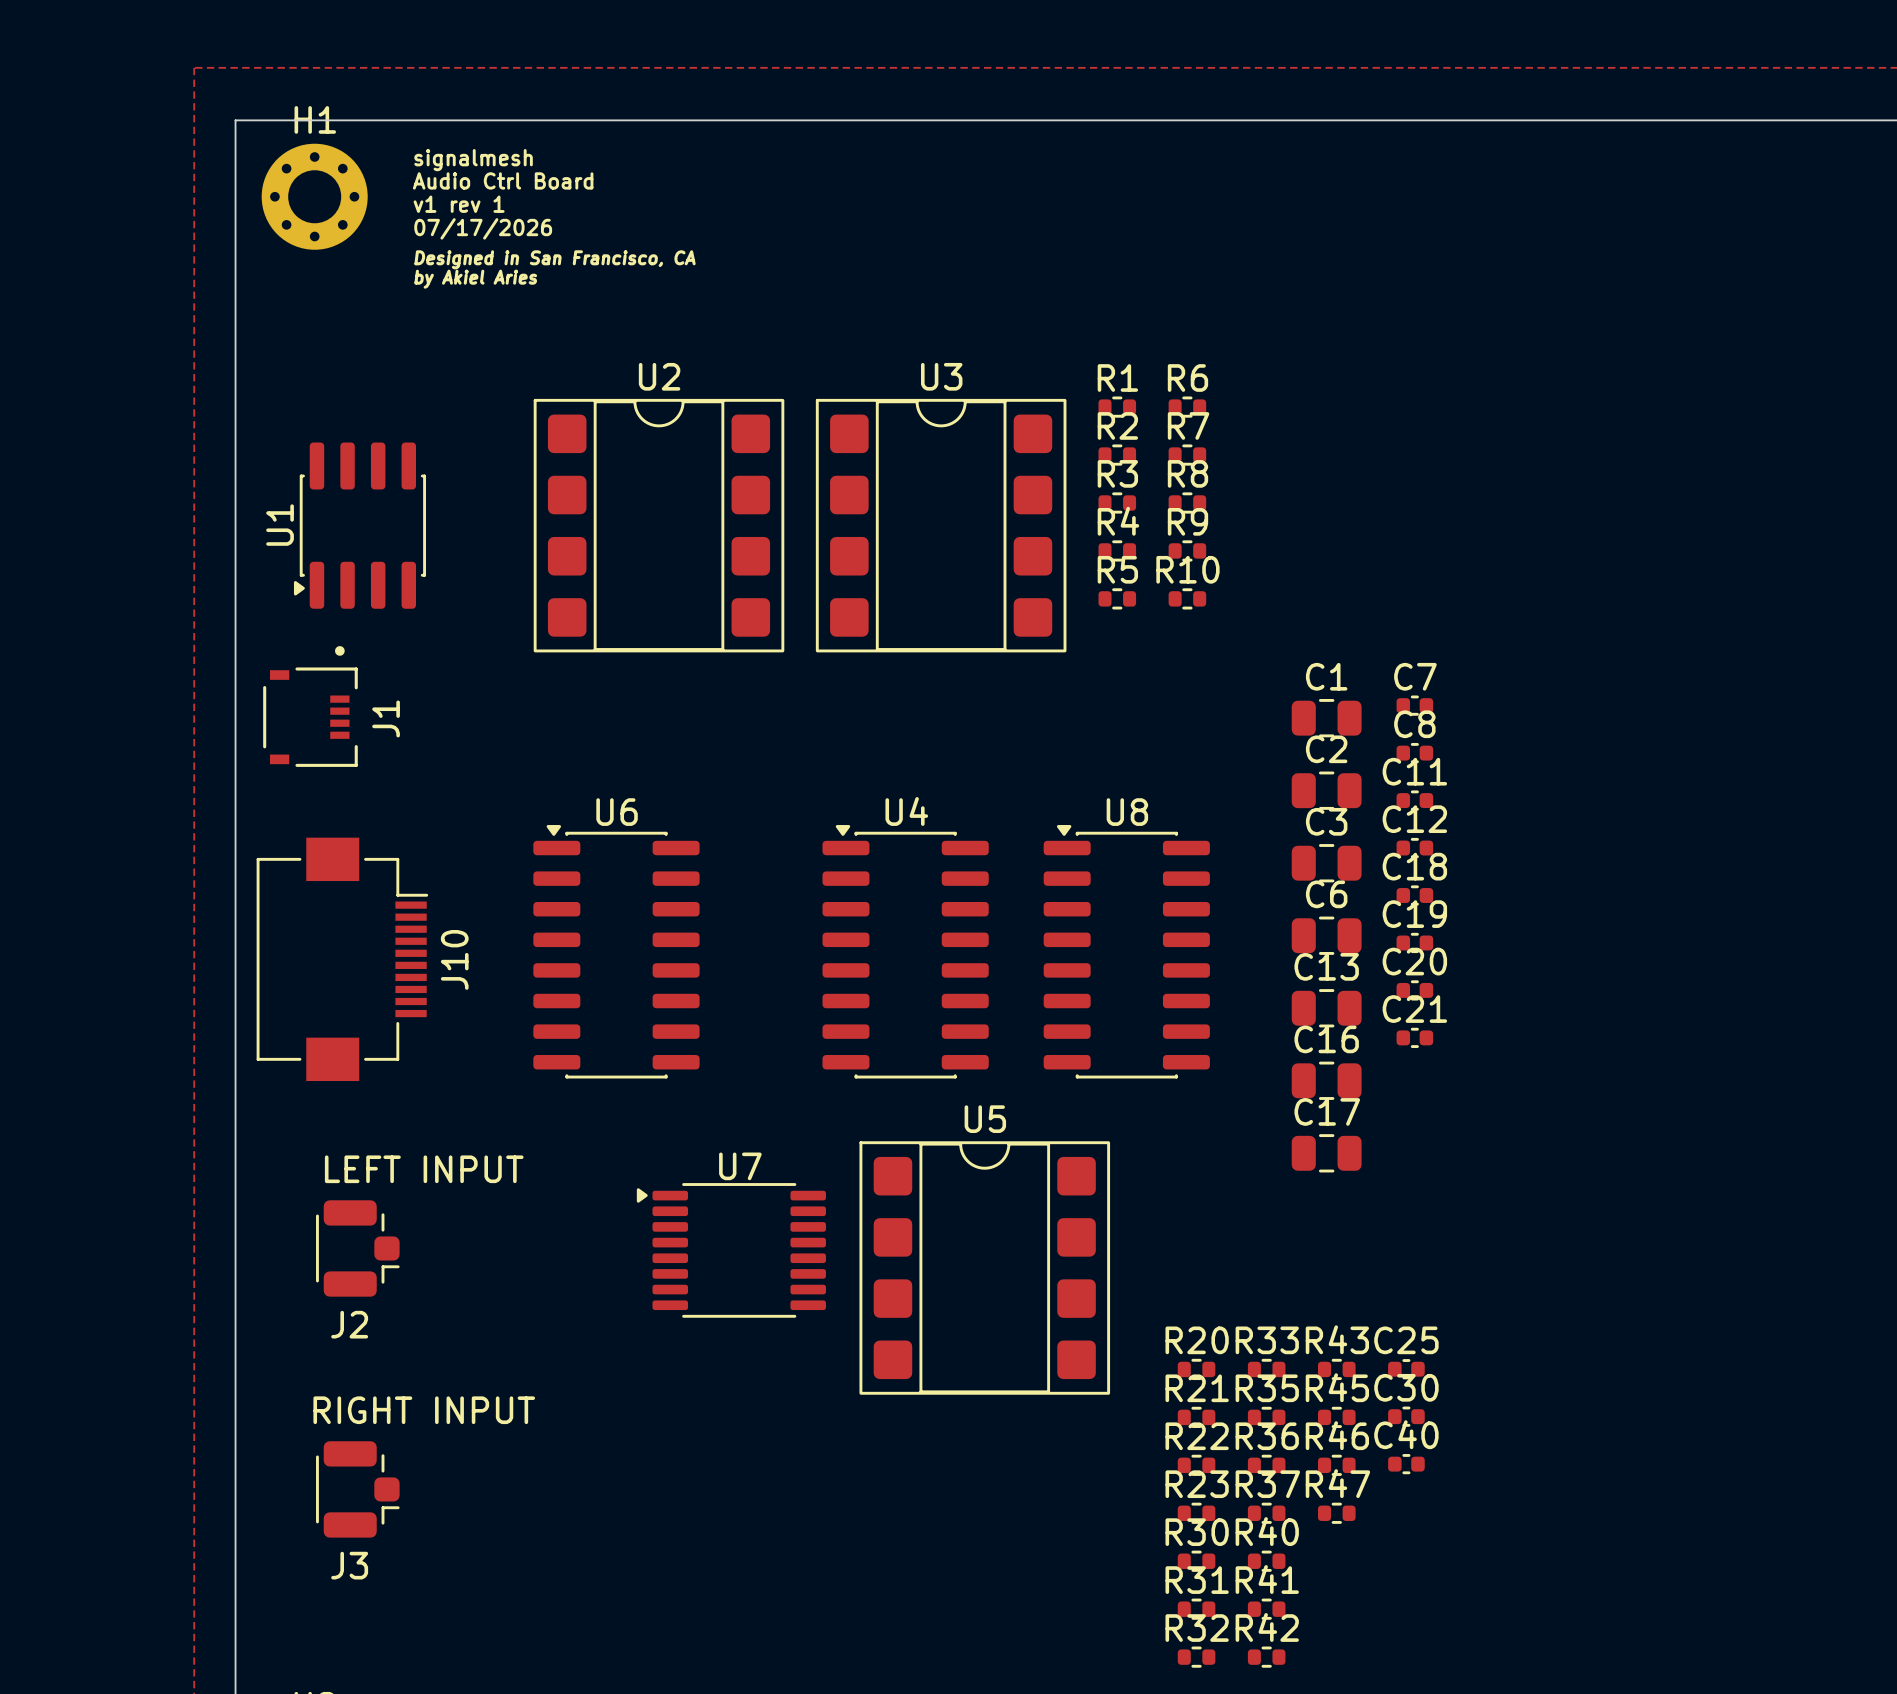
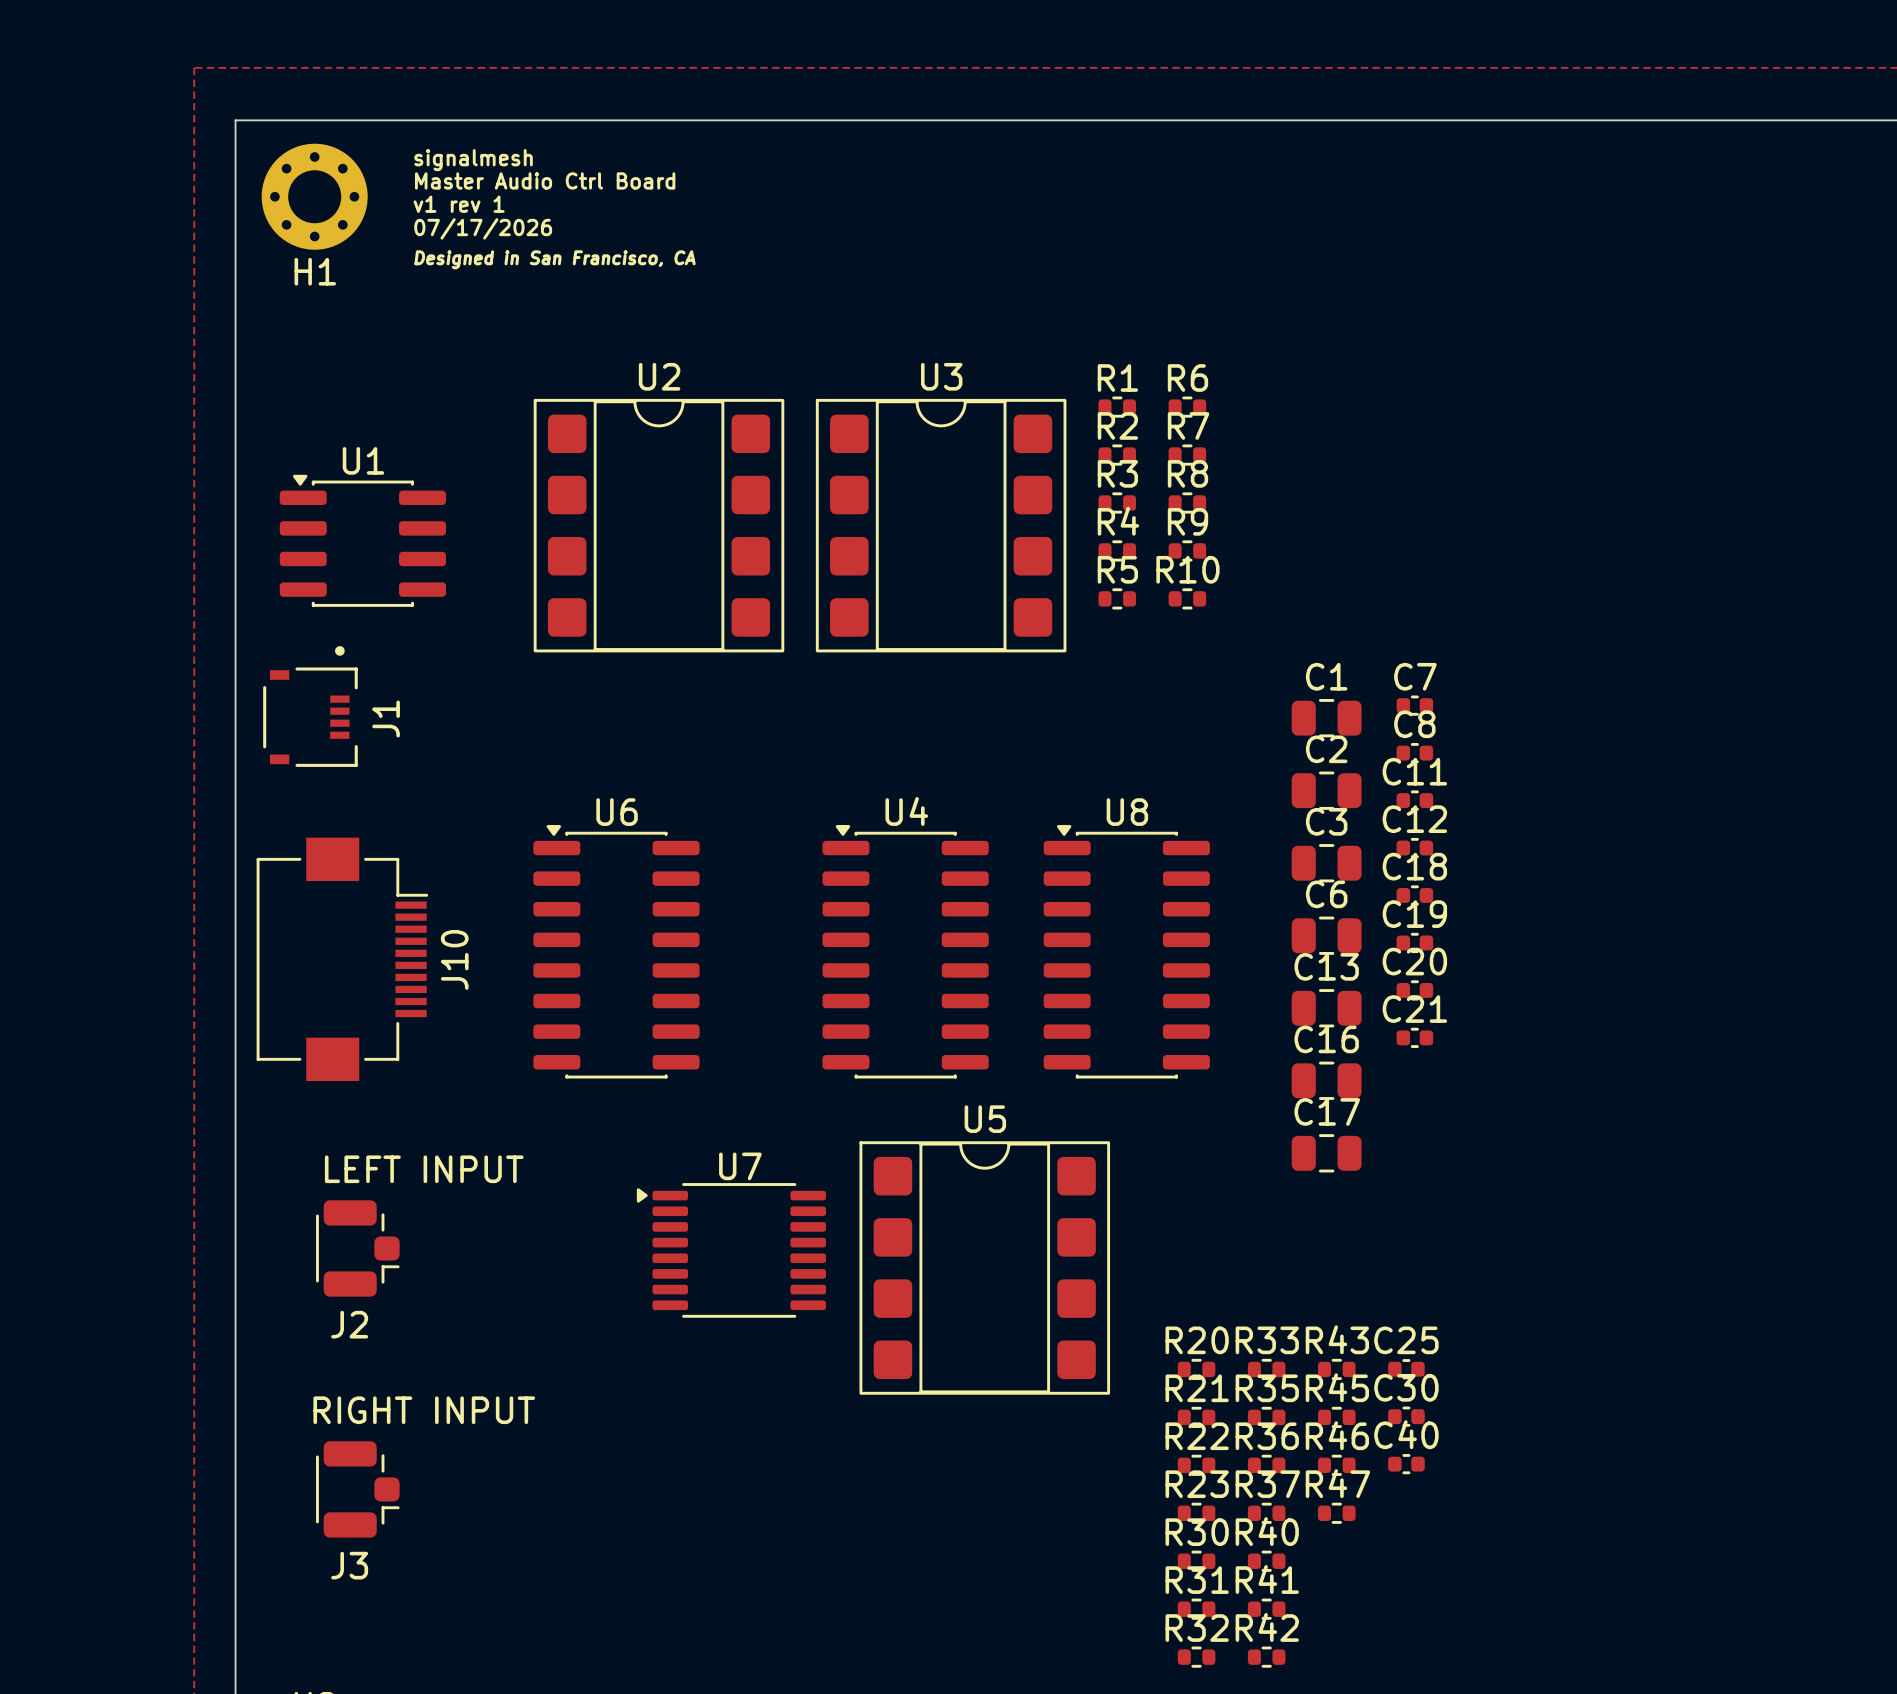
H1 name position: H1 (315, 119) -> H1 (315, 271)
text: Audio Ctrl Board (503, 180) -> Master Audio Ctrl Board (545, 180)
text: by Akiel Aries (475, 279) -> none
U1 rotation: 0° (359, 525) -> 90° clockwise (362, 540)

